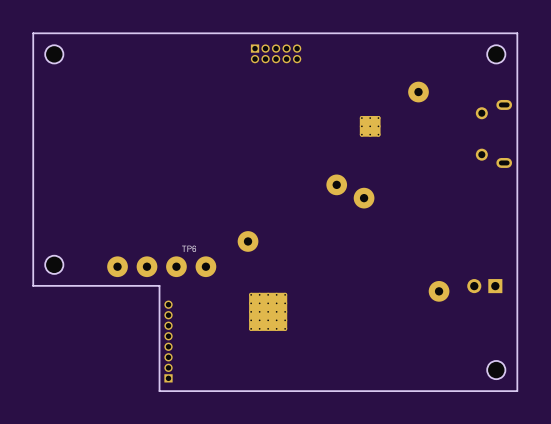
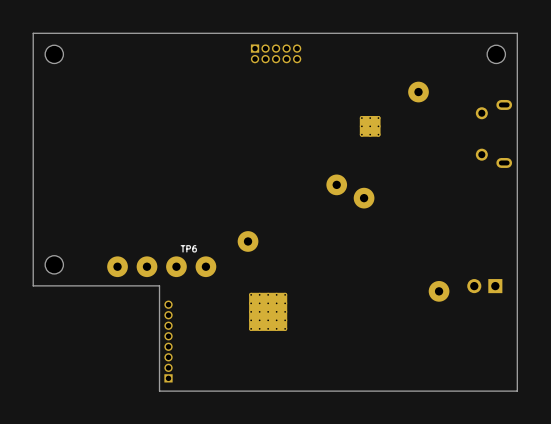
part: (496, 370) -> none

